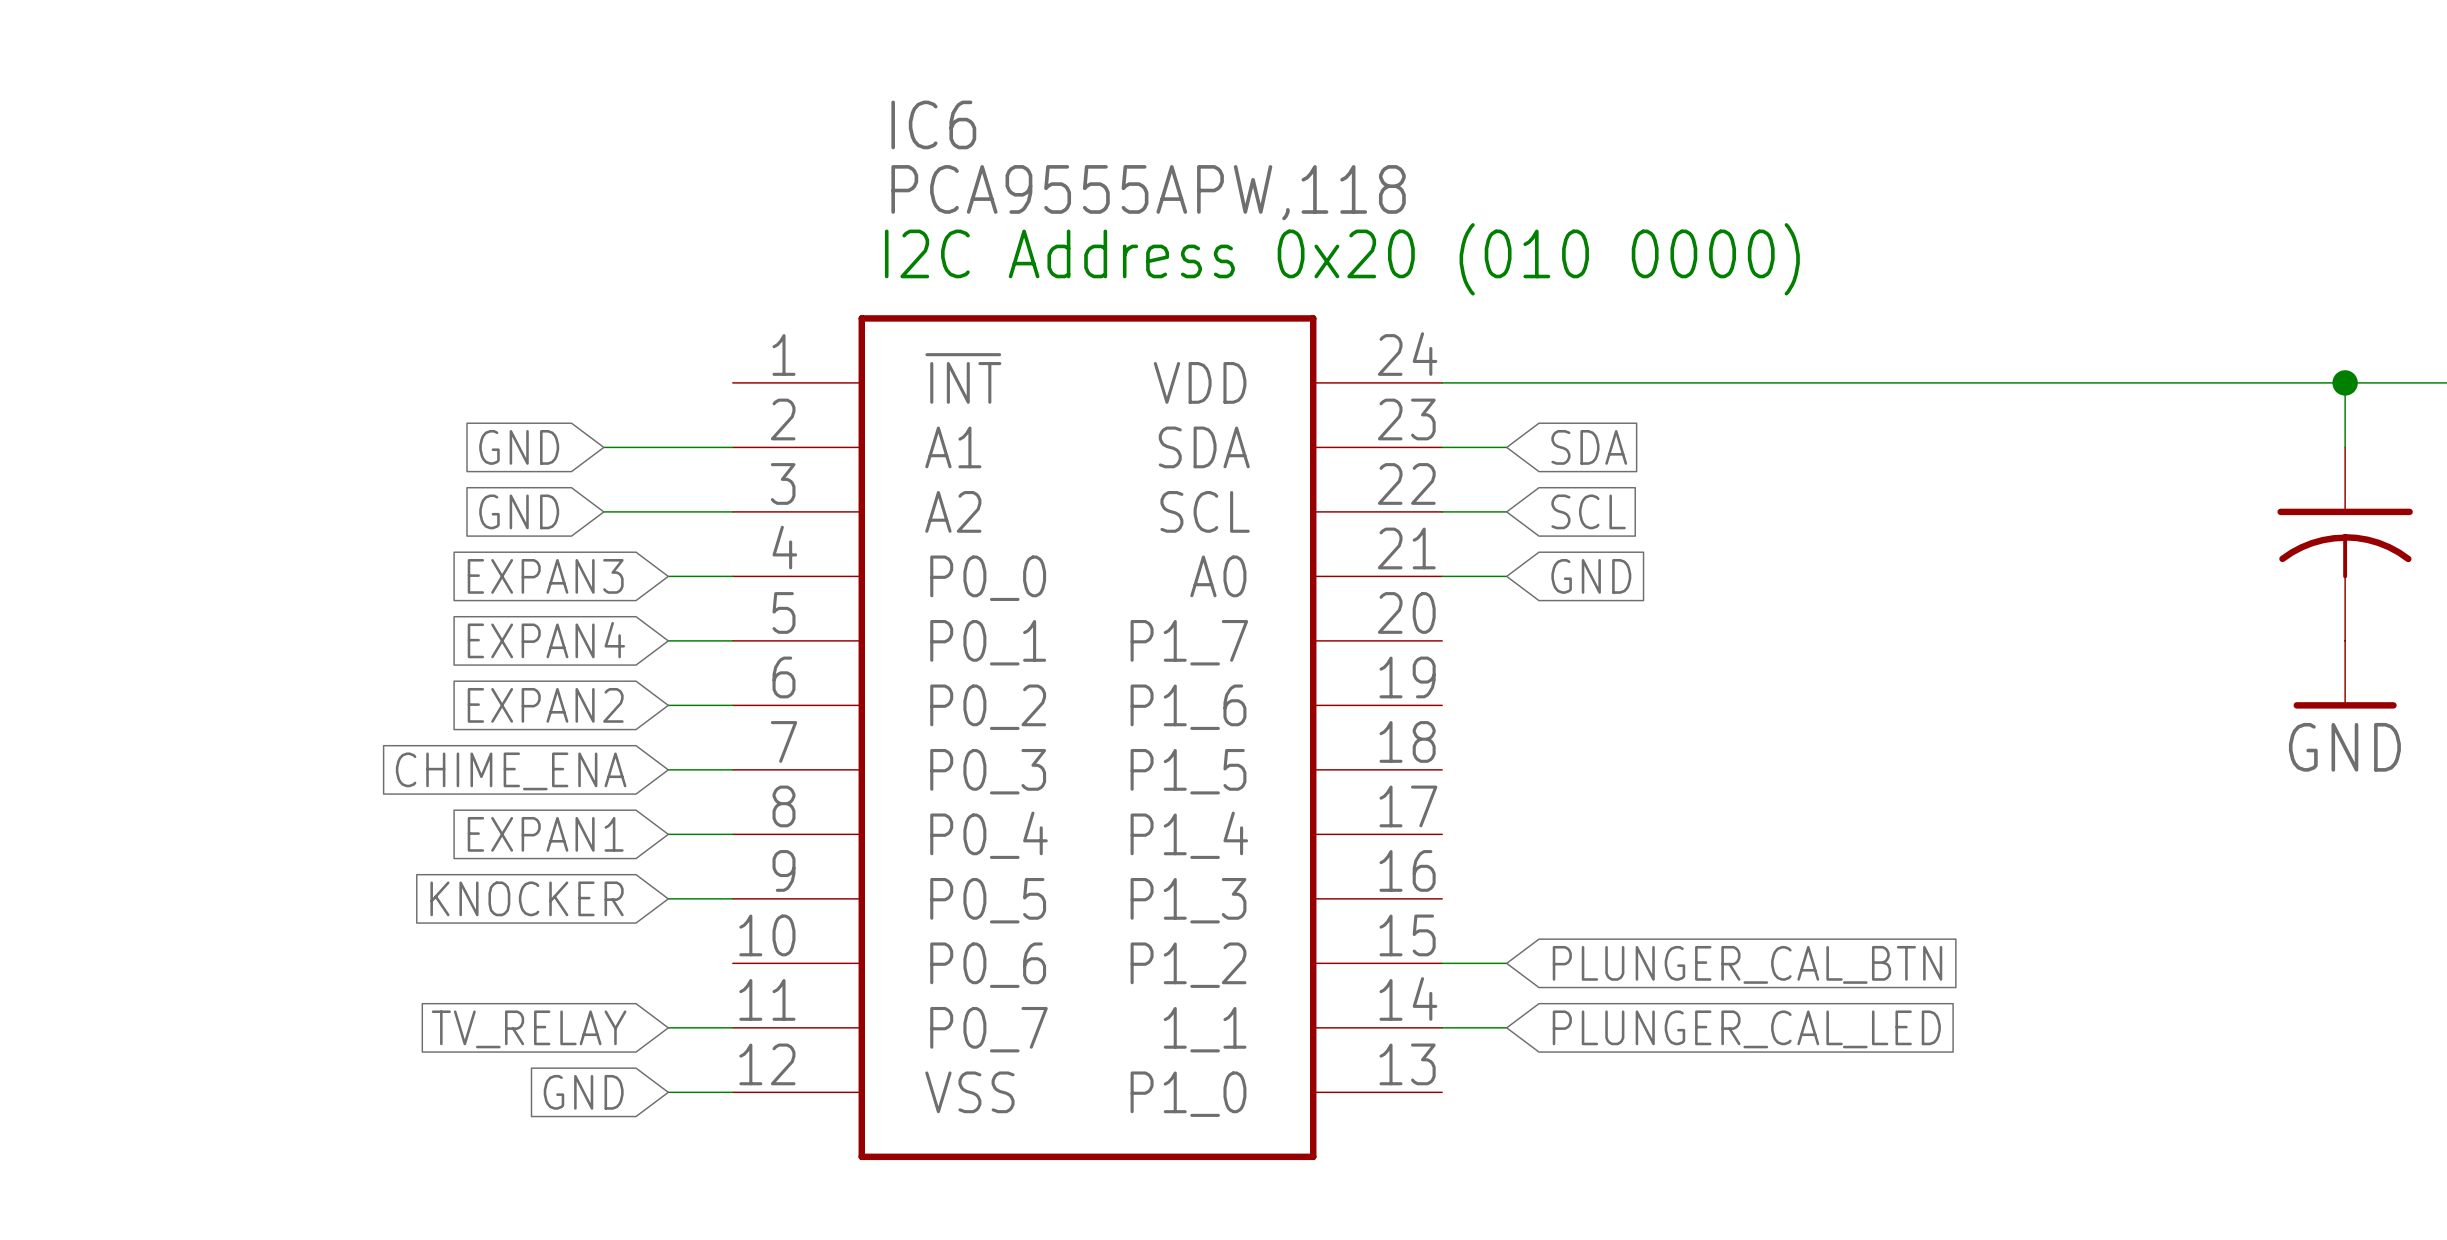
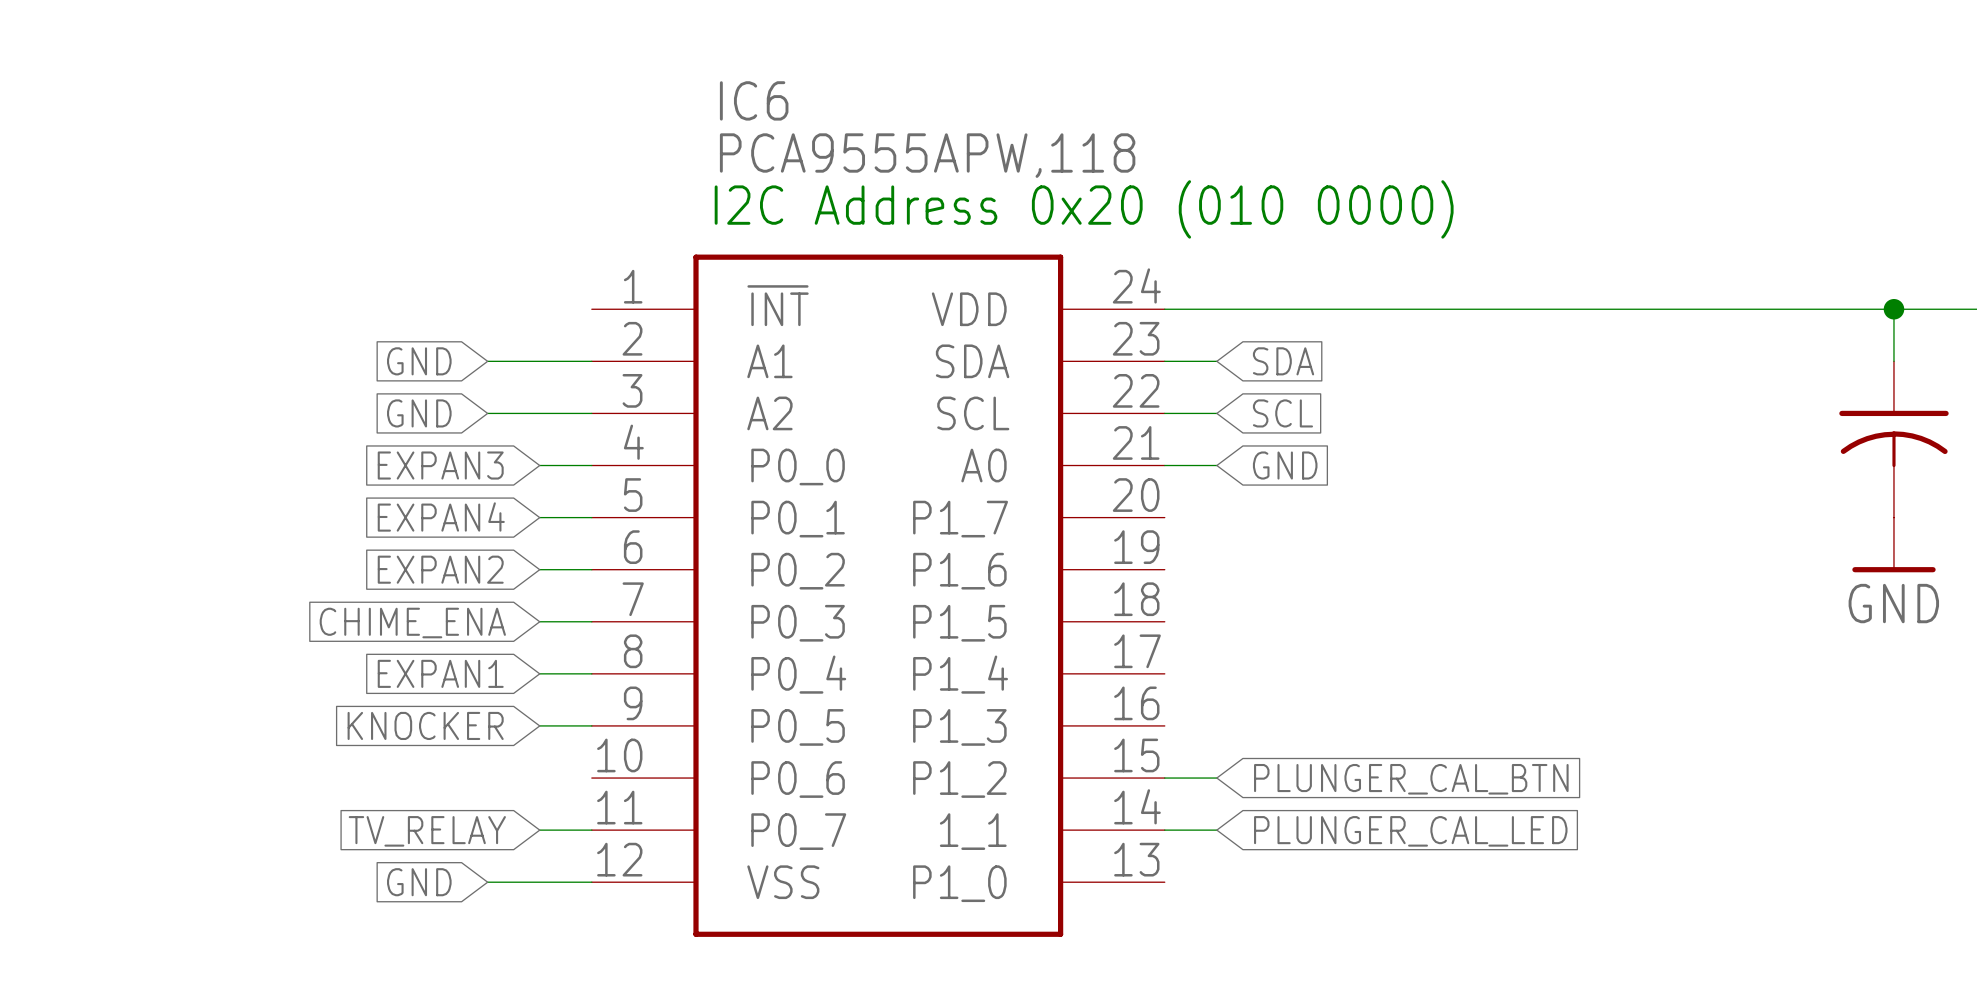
global label position: GND (583, 1092) -> GND (419, 882)
wire: none -> (487, 882) (539, 882)

